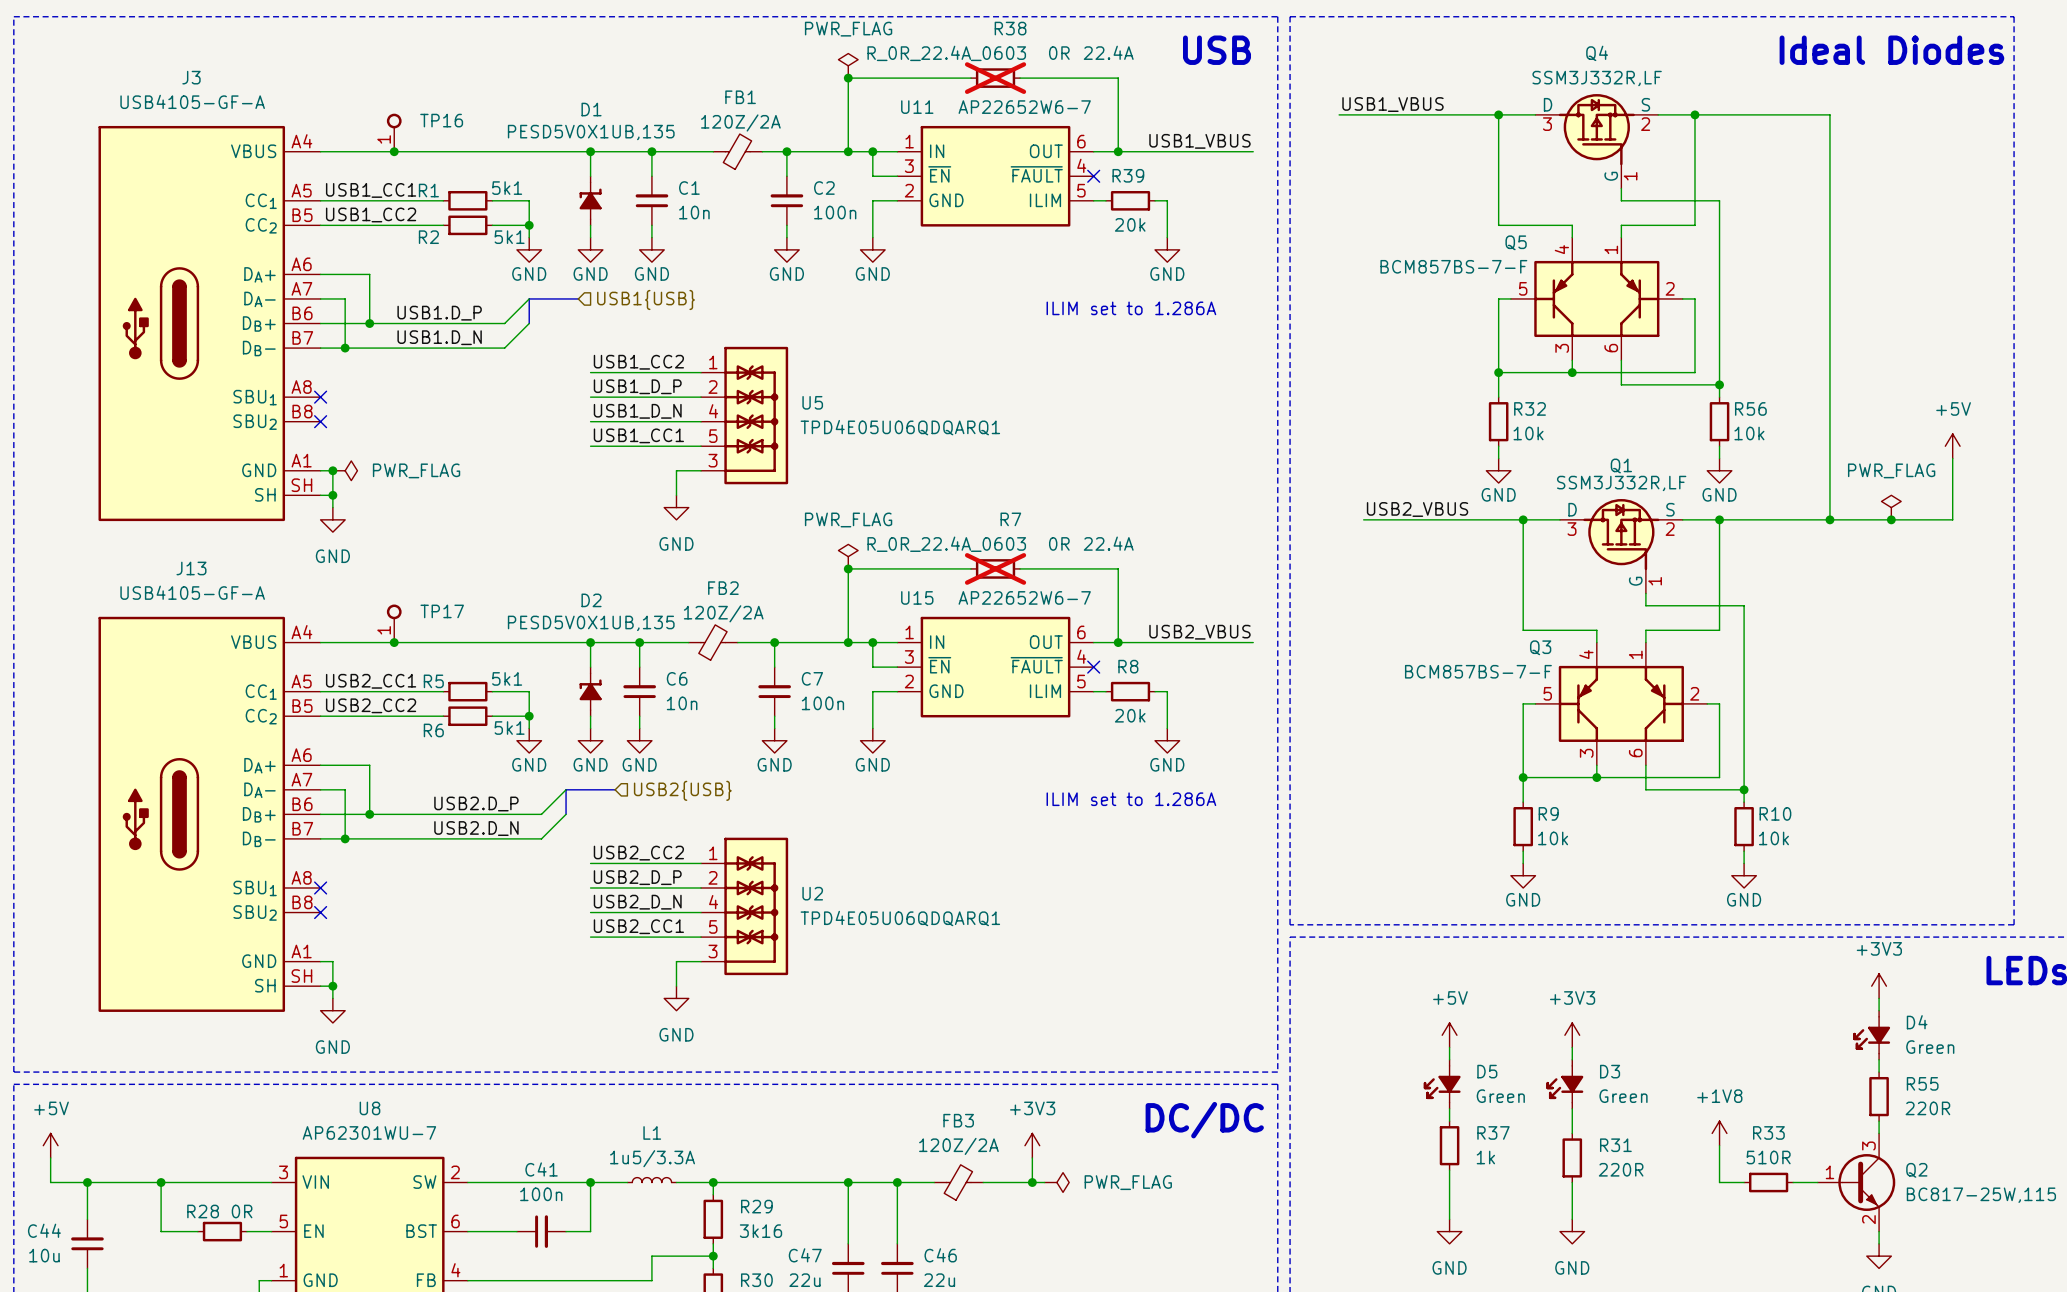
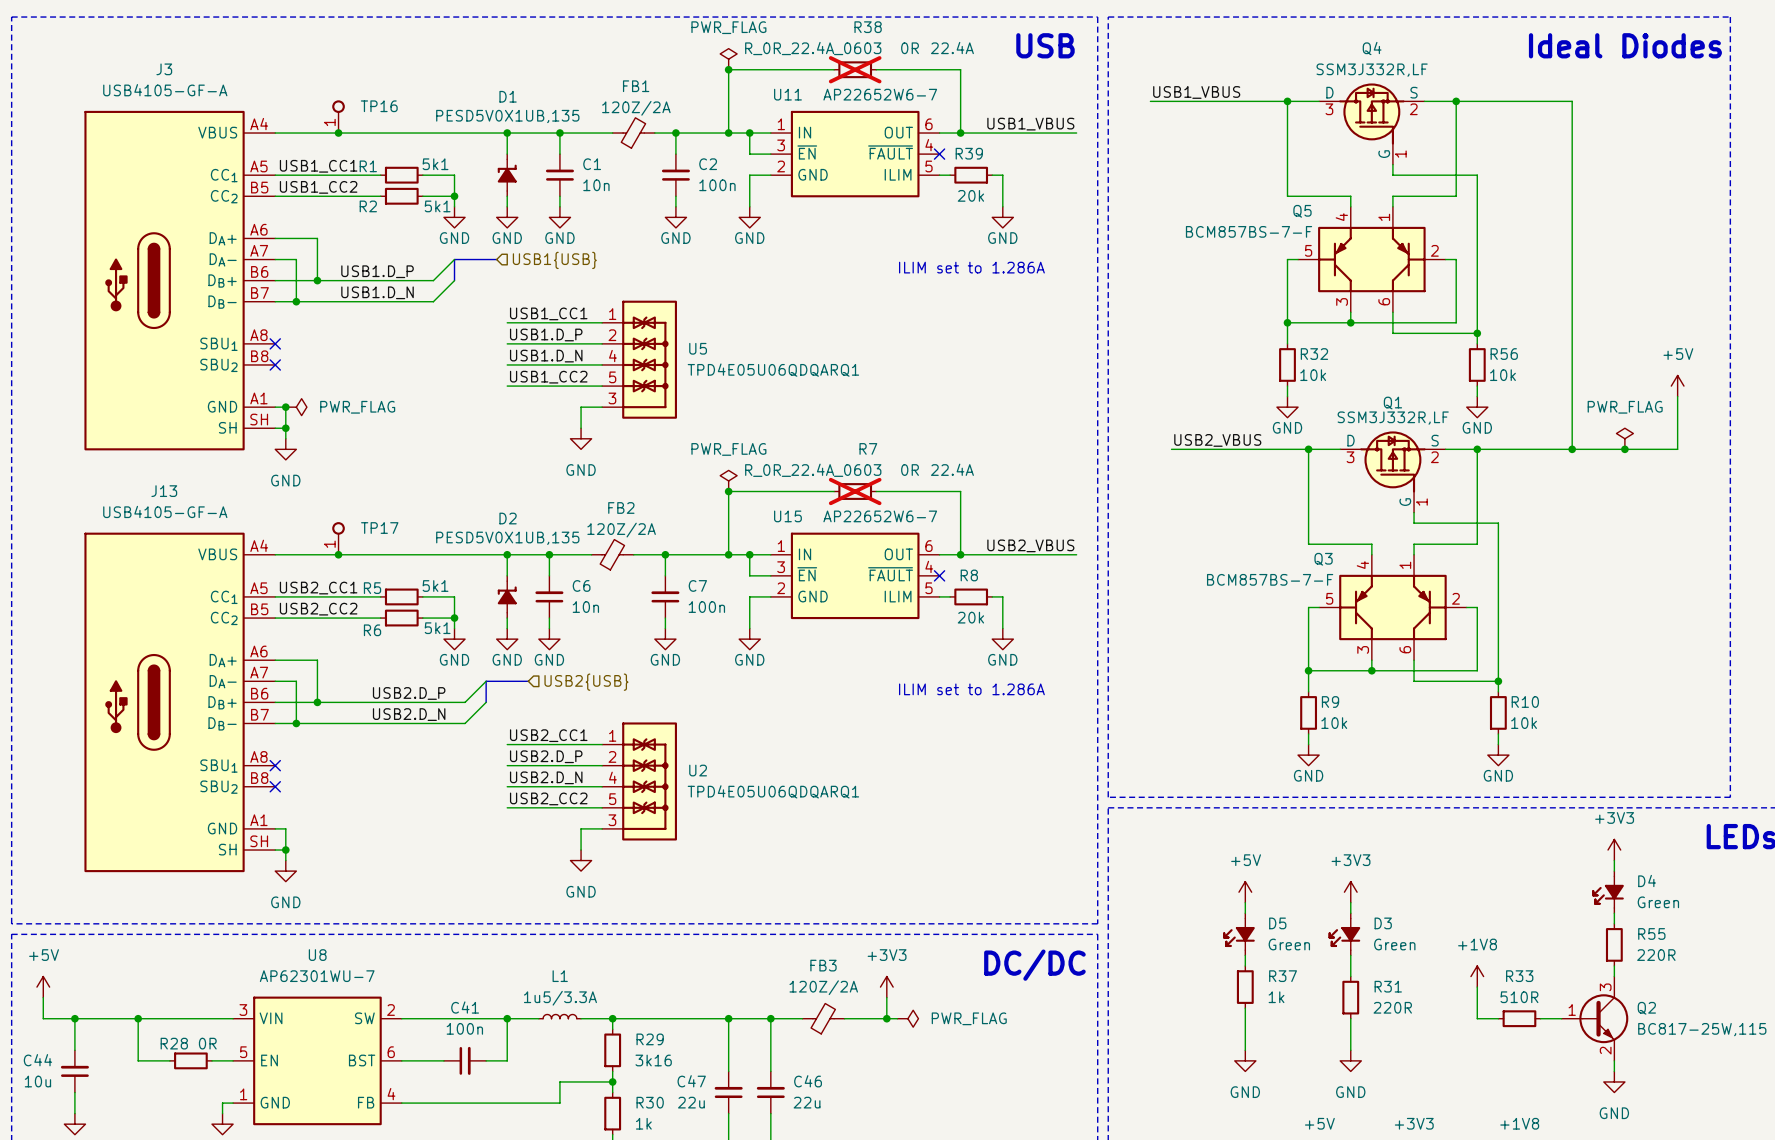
label: USB1_CC2 (638, 362) -> USB1_CC1 (548, 313)
label: USB1_D_P (637, 386) -> USB1.D_P (546, 334)
label: USB1_D_N (637, 411) -> USB1.D_N (546, 356)
label: USB1_CC1 (638, 435) -> USB1_CC2 (548, 377)
label: USB2_CC2 (638, 853) -> USB2_CC1 (548, 735)
label: USB2_D_P (637, 877) -> USB2.D_P (546, 756)
label: USB2_D_N (637, 902) -> USB2.D_N (546, 777)
label: USB2_CC1 (638, 926) -> USB2_CC2 (548, 798)

